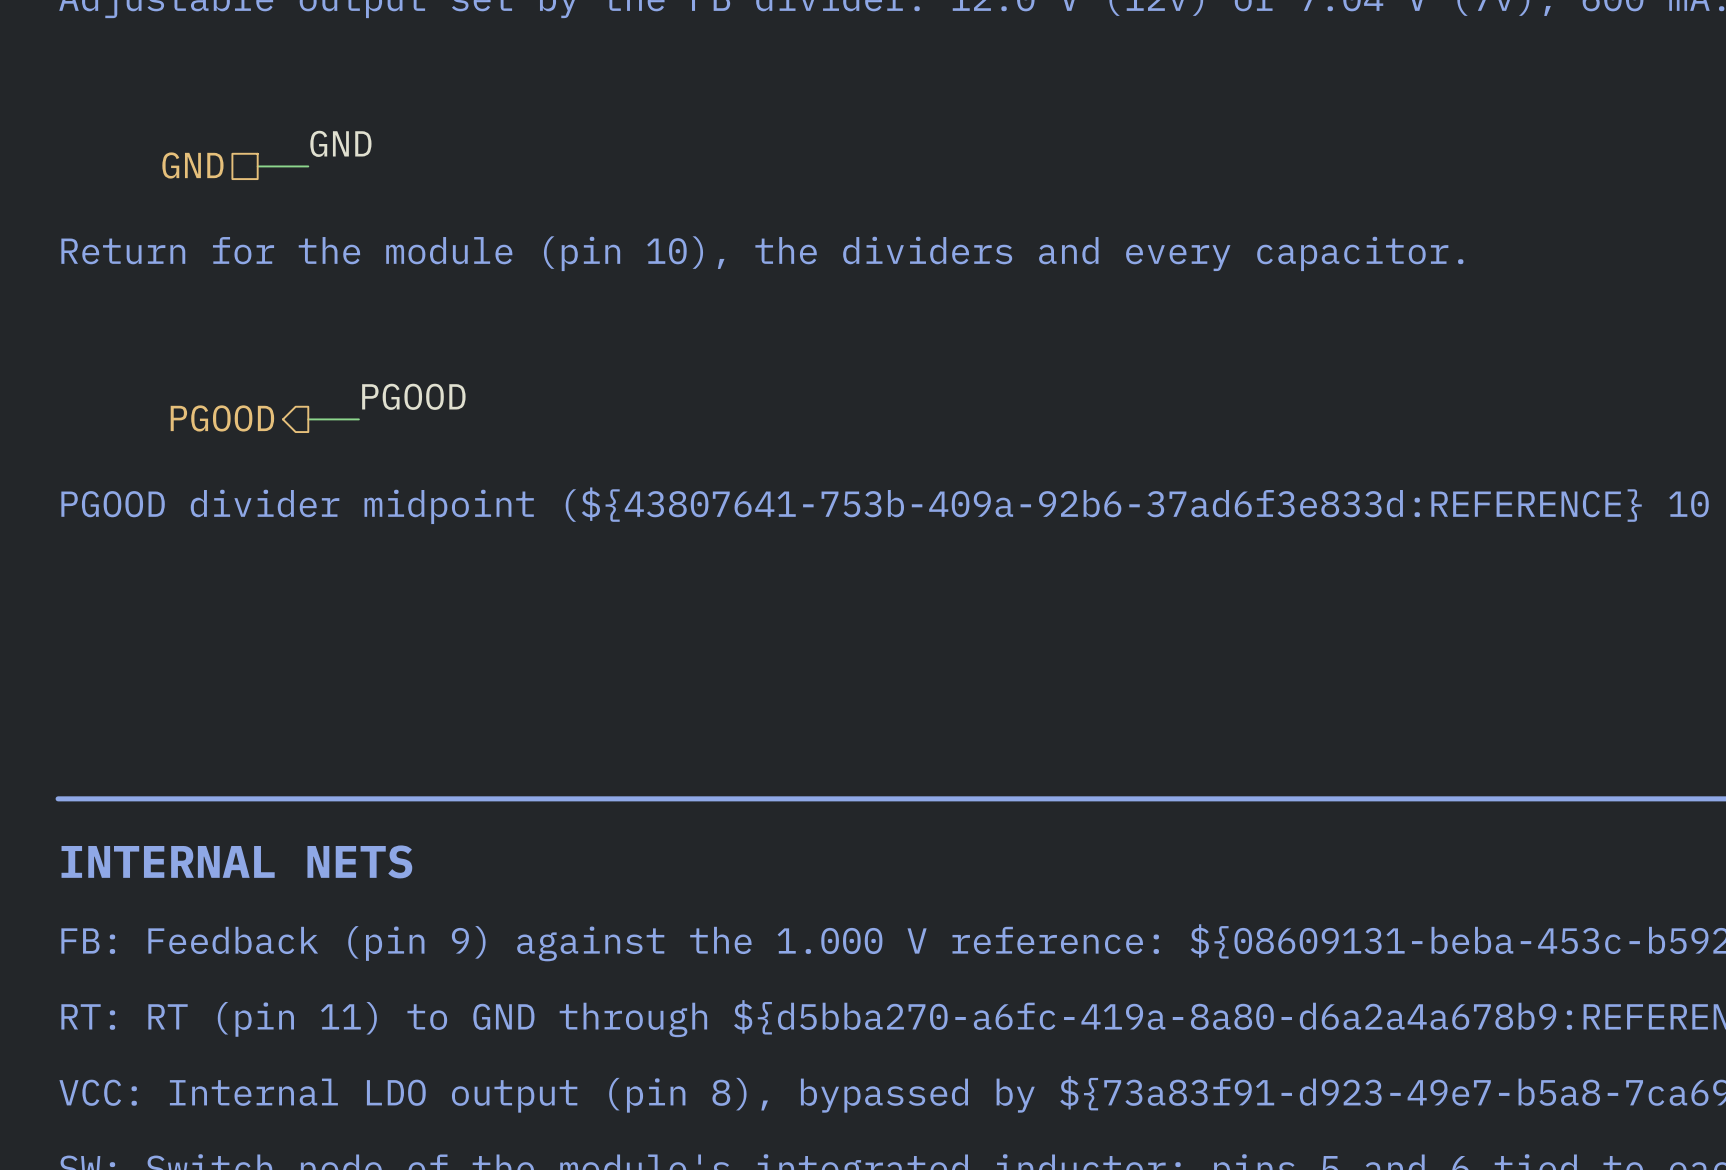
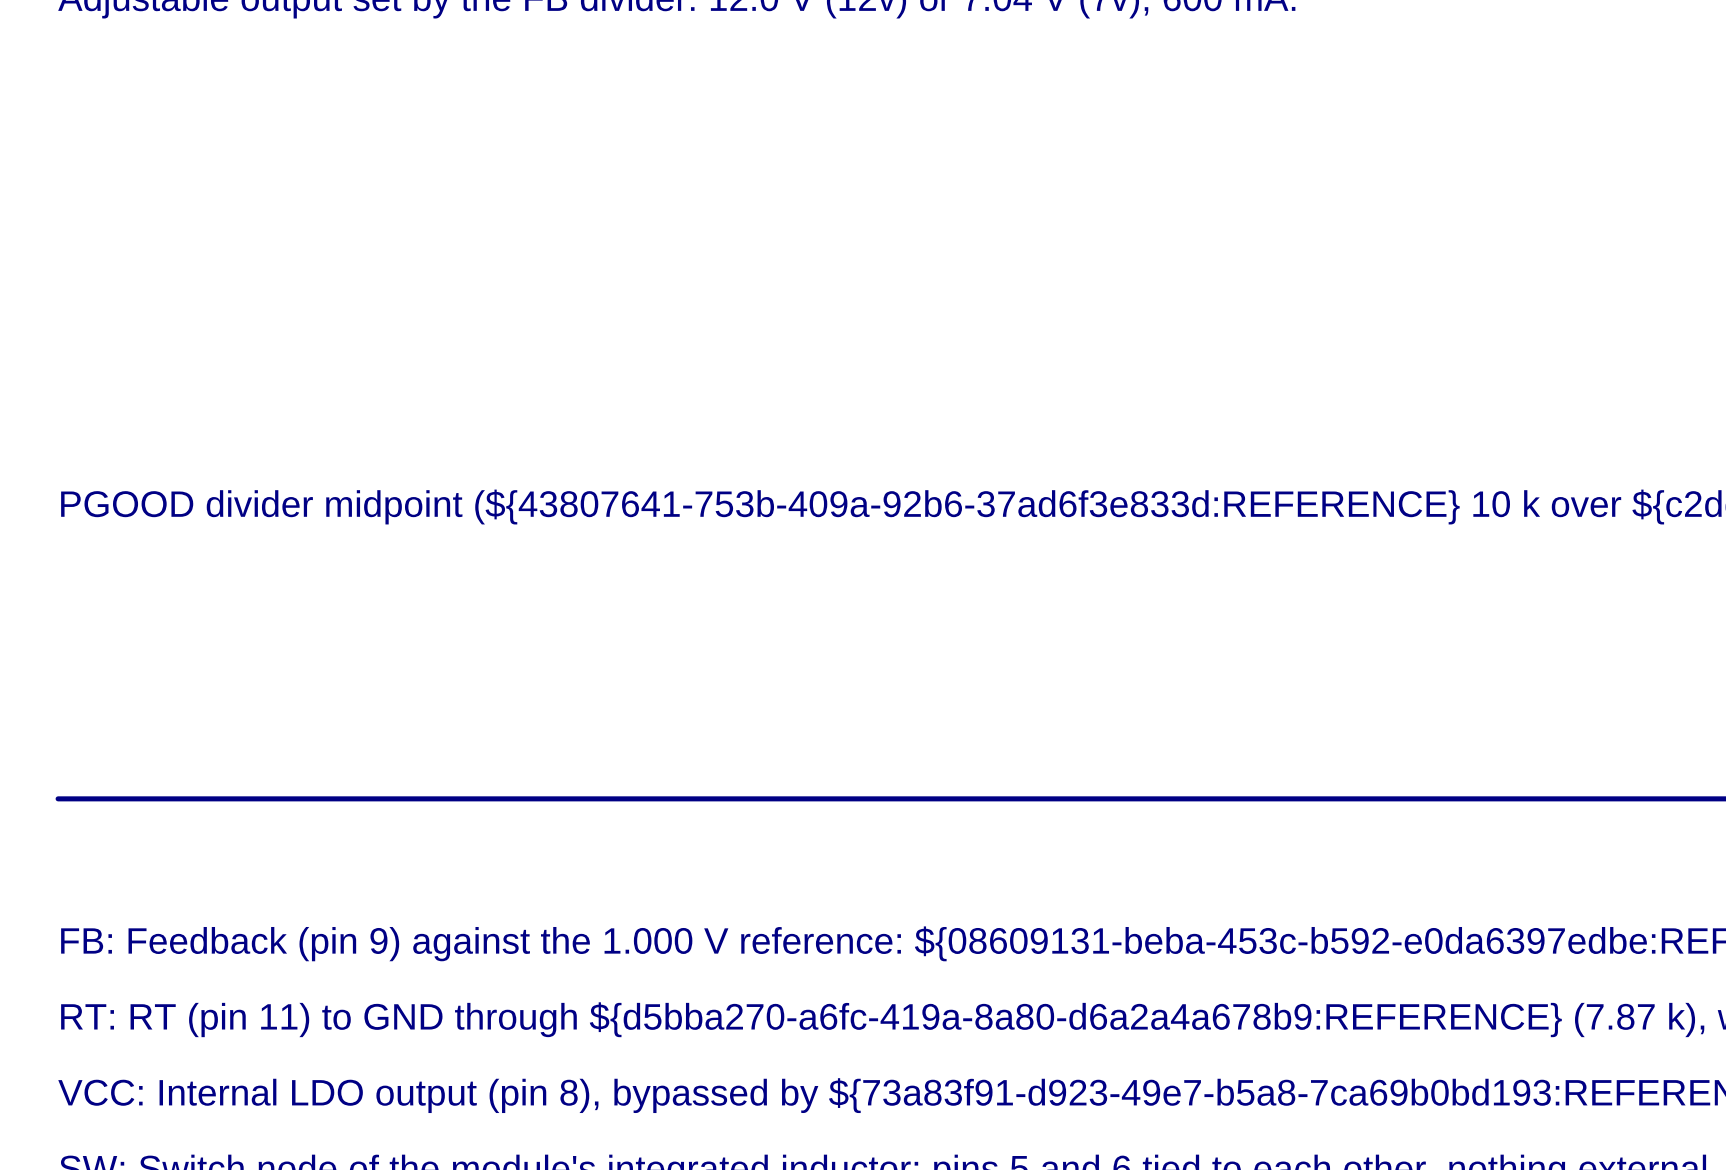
label: GND (340, 143) -> none
hierarchical label: GND (192, 165) -> none
wire: (257, 166) (308, 166) -> none
text: Return for the module (pin 10), the dividers and every capacitor. (762, 253) -> none
label: PGOOD (413, 396) -> none
hierarchical label: PGOOD (222, 418) -> none
wire: (308, 419) (358, 419) -> none
text: INTERNAL NETS (236, 861) -> none

